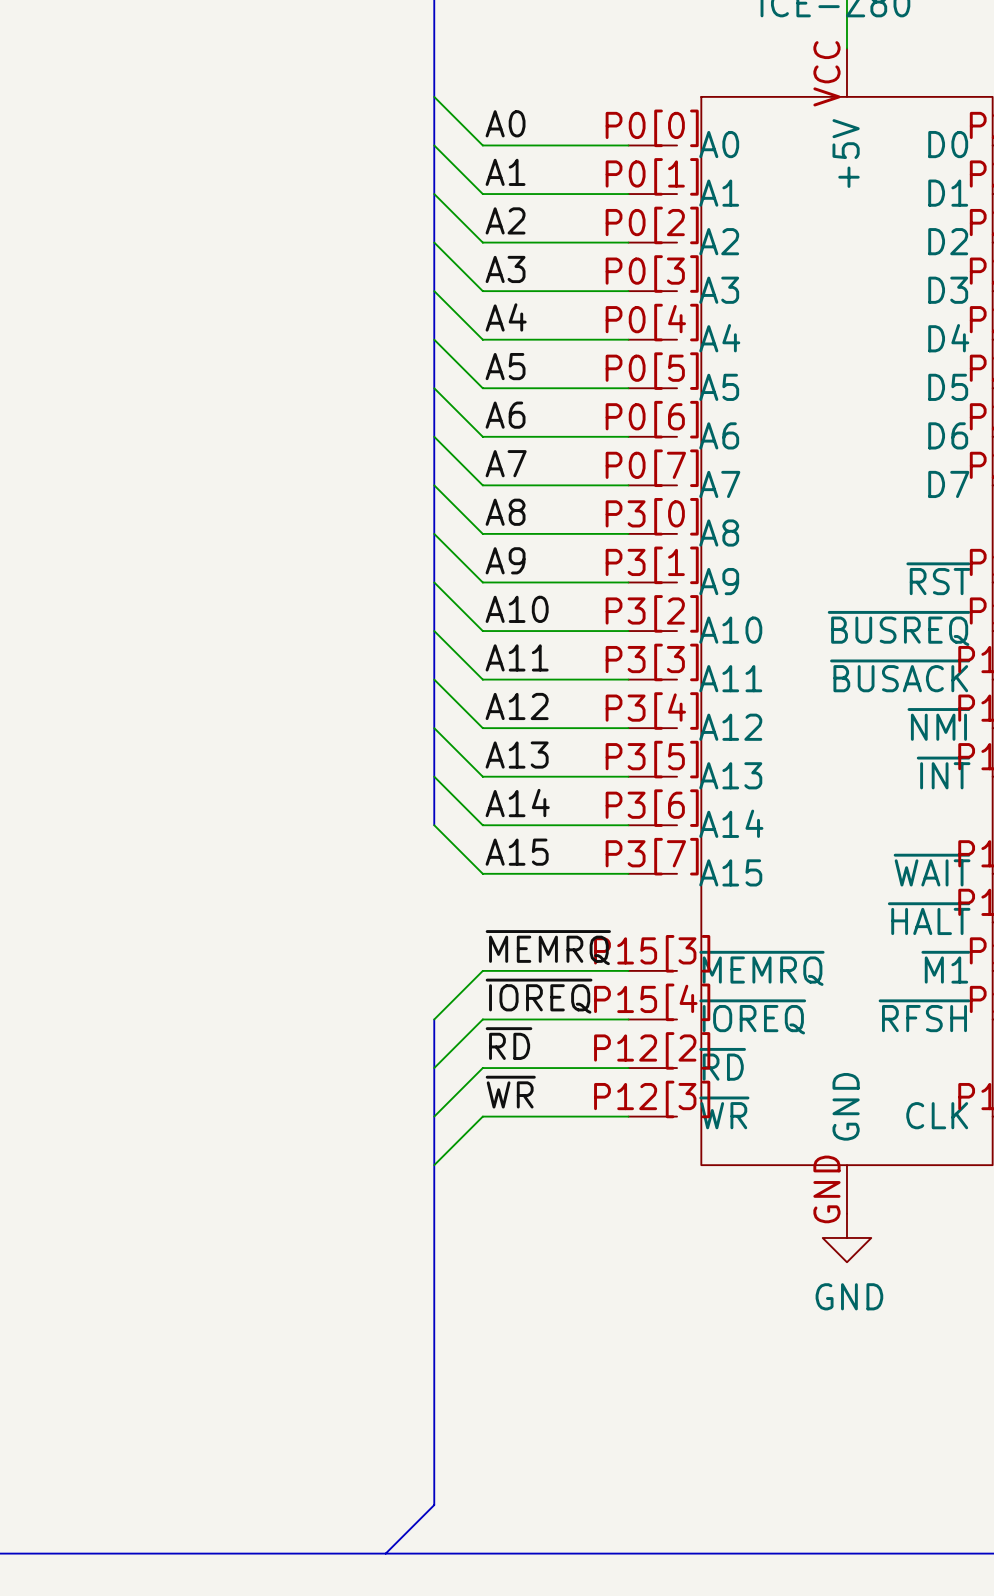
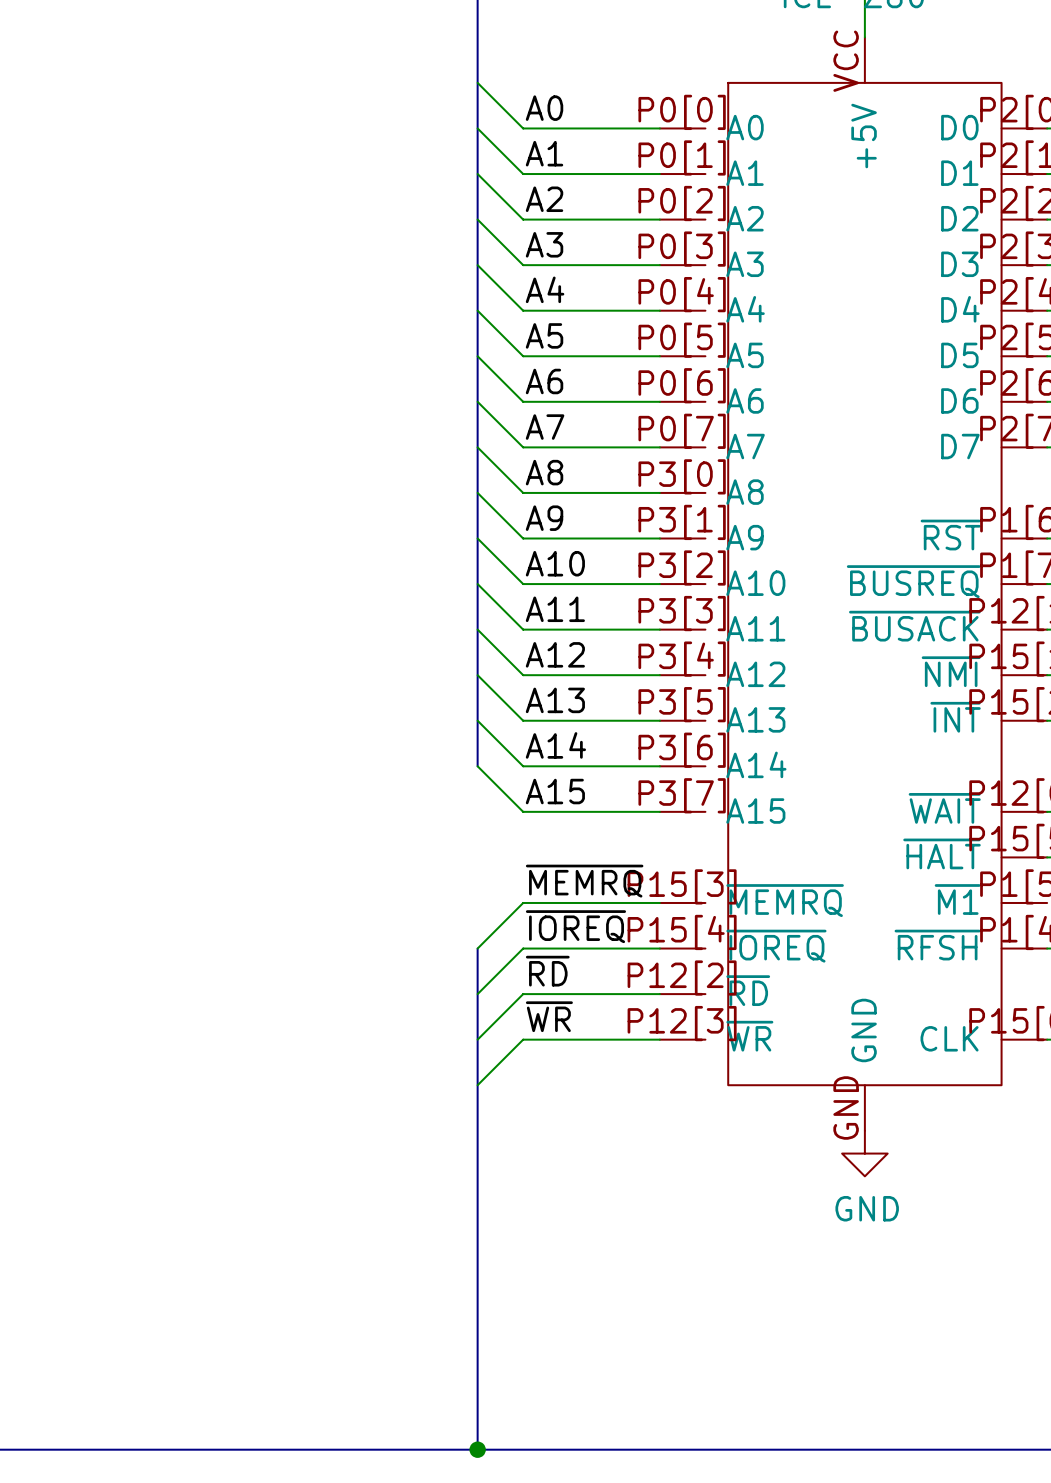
bus: (434, 1505) (385, 1553) -> (477, 1404) (477, 1449)
junction: none -> (477, 1449)

